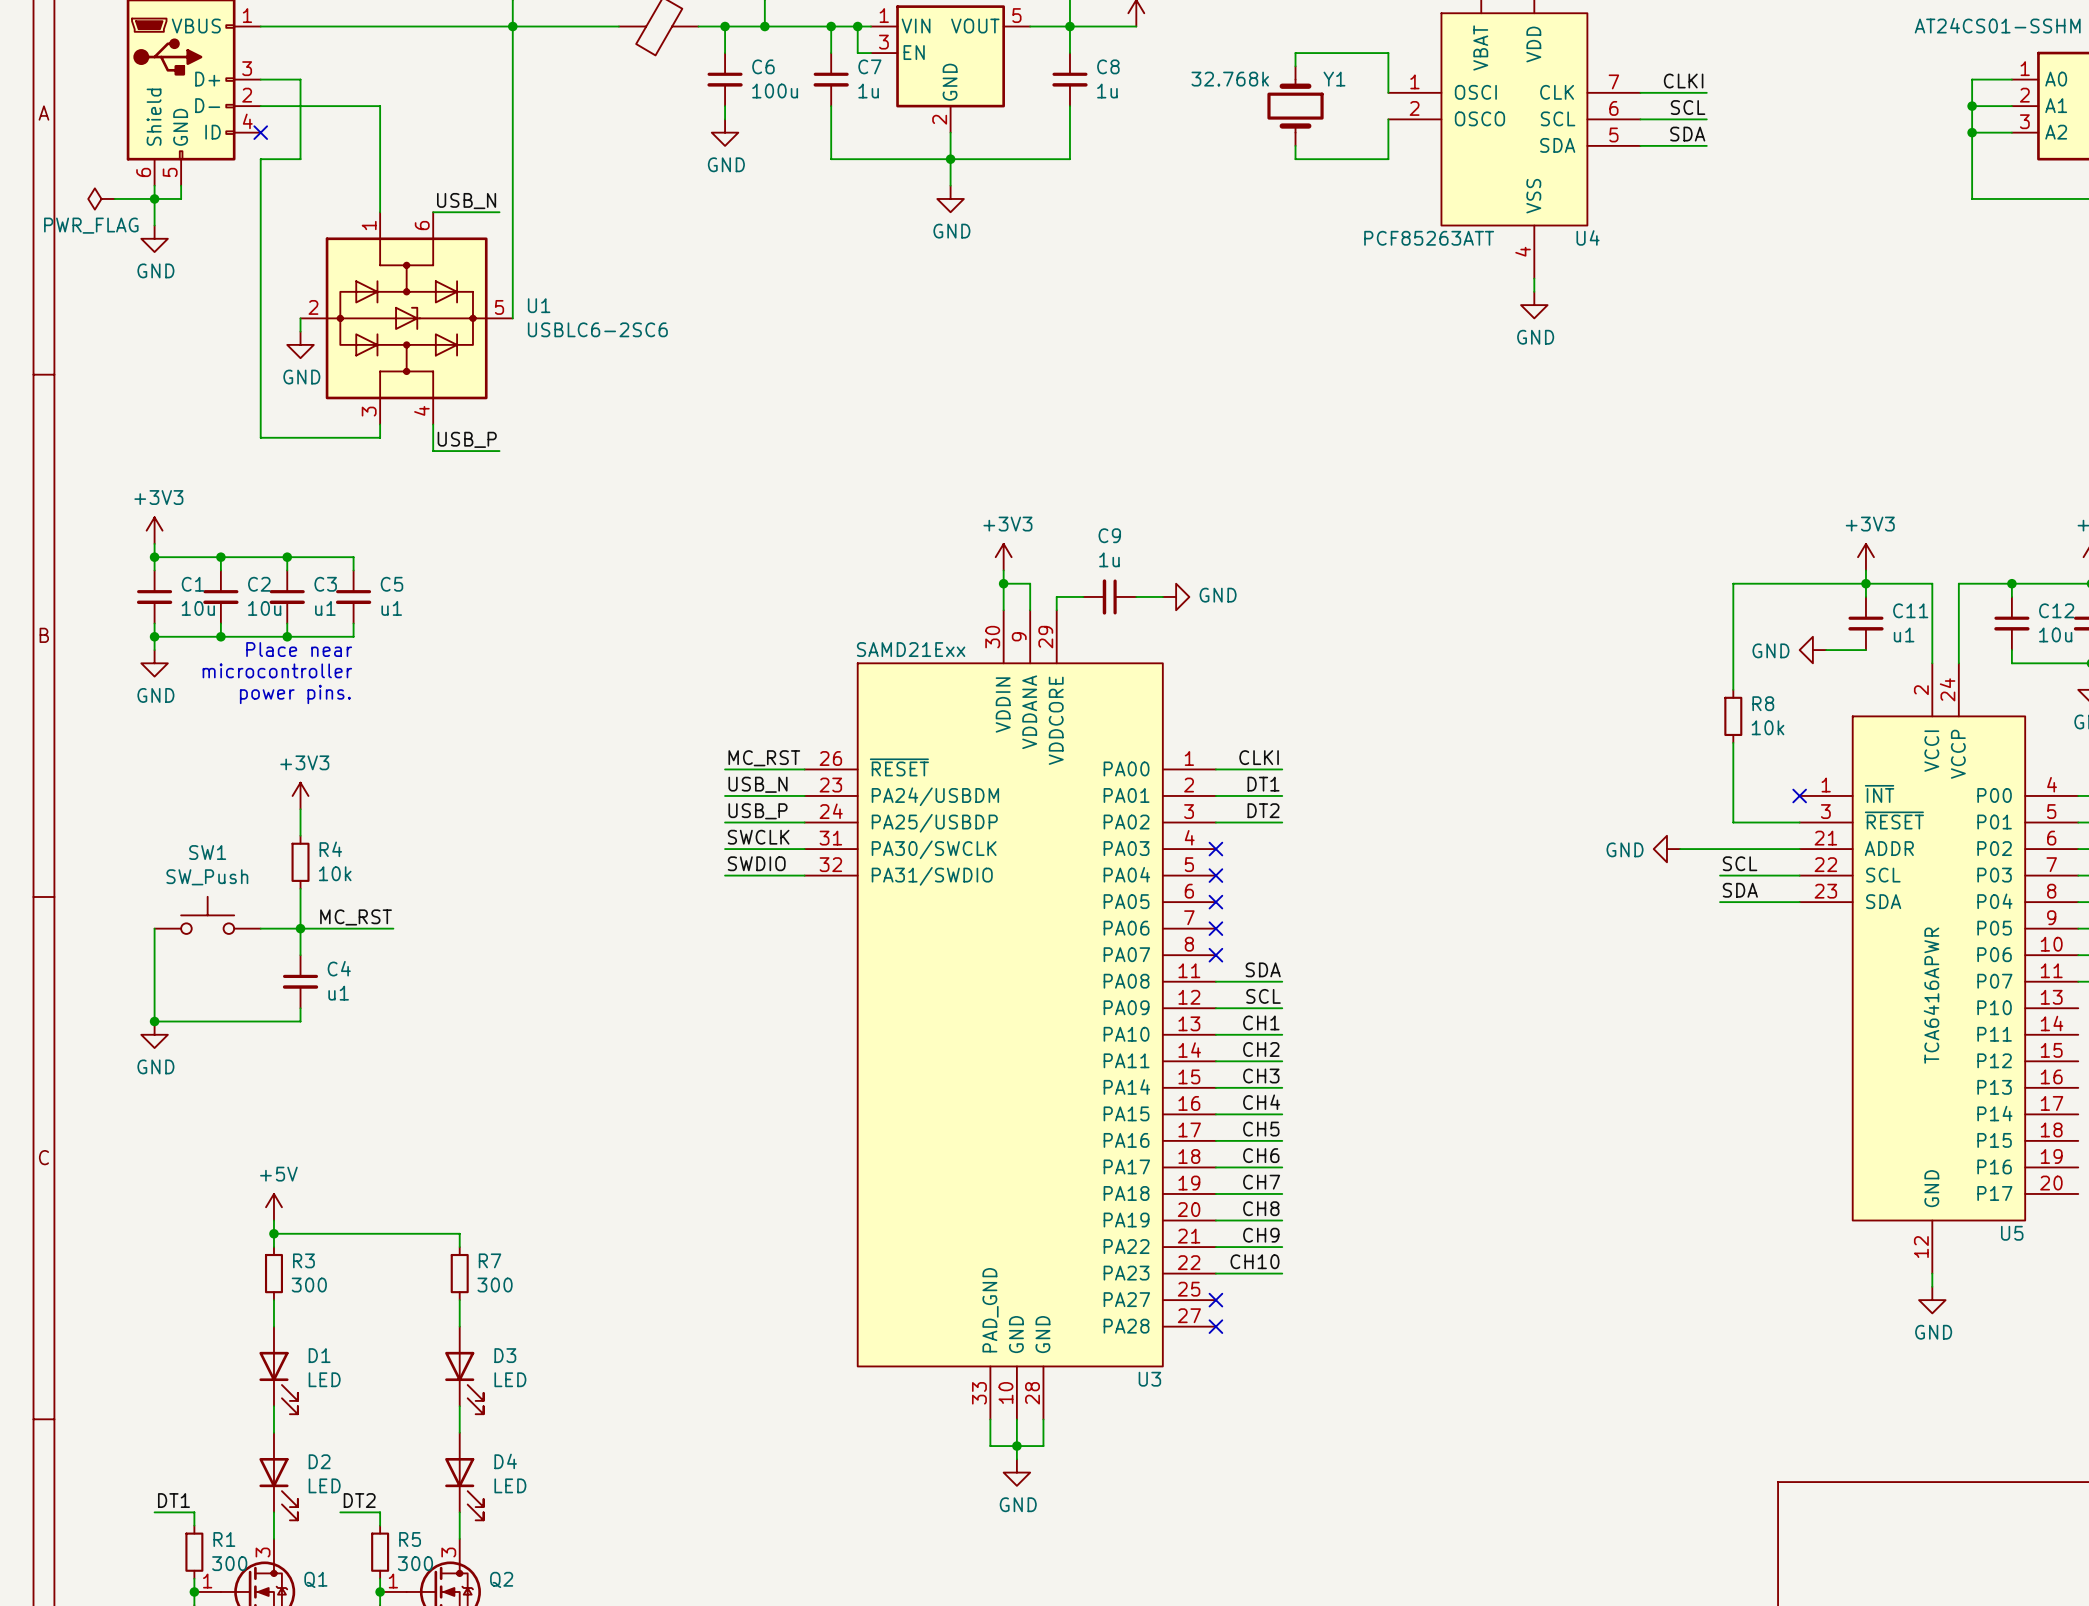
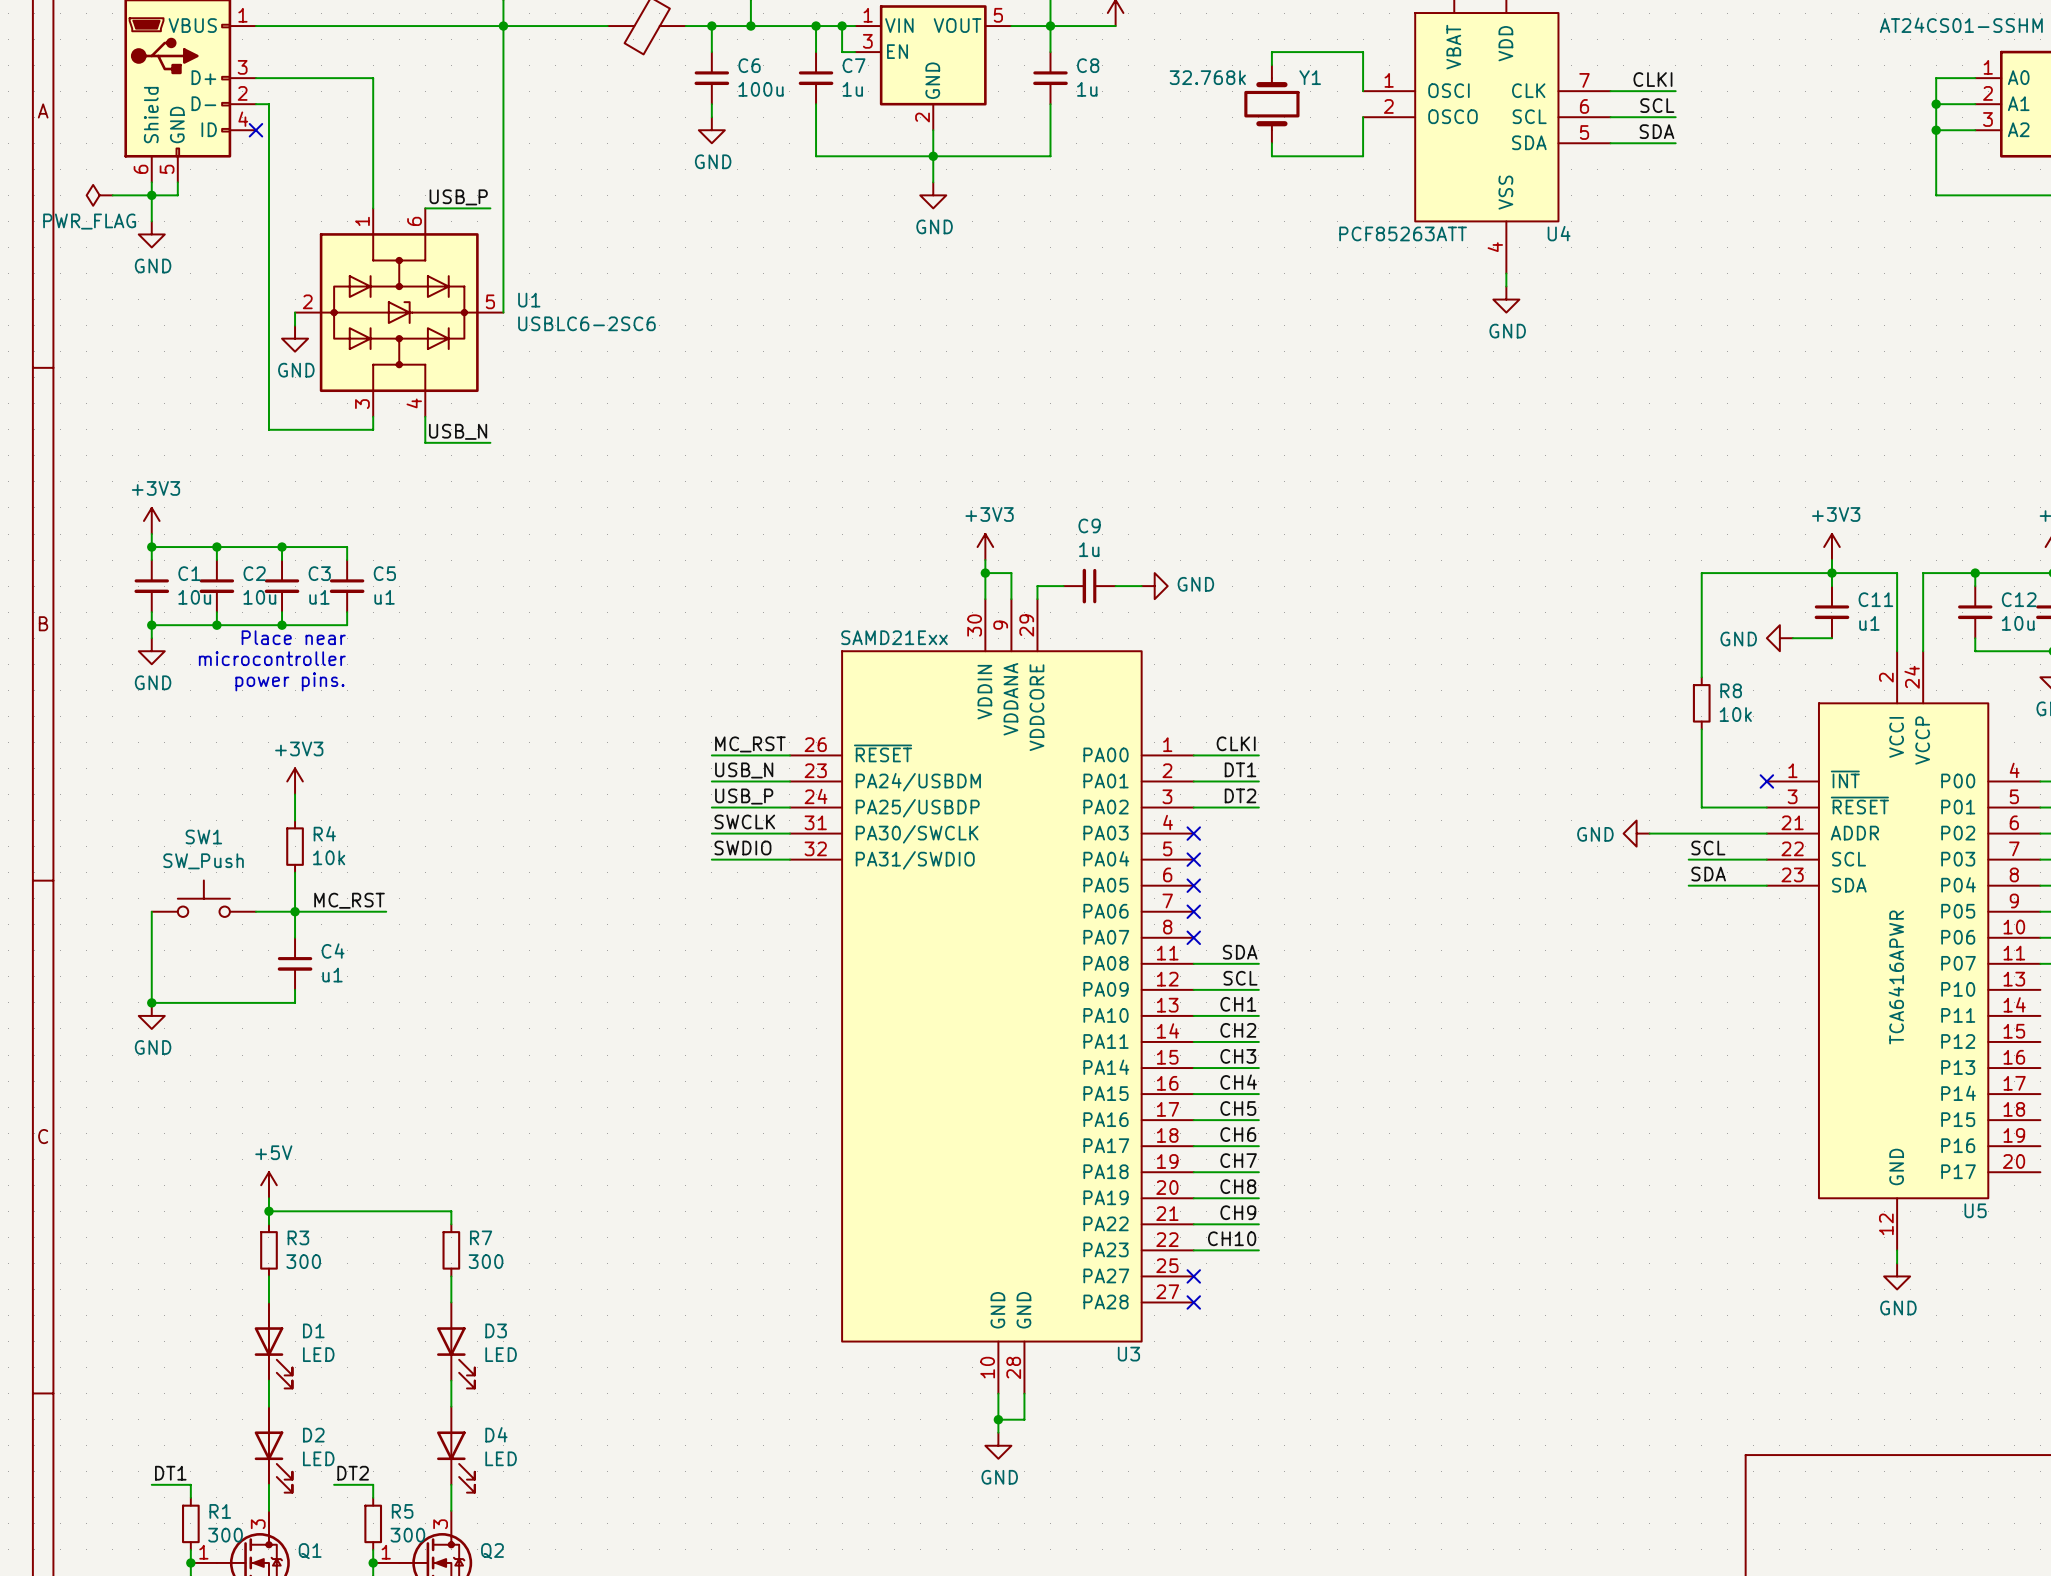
wire: (300, 79) (300, 159) (260, 159) (260, 437) (273, 437) -> (268, 104) (268, 429)
wire: (273, 106) (380, 106) -> (295, 78) (373, 78) (373, 104)
label: USB_N (466, 201) -> USB_P (458, 197)
label: USB_P (467, 439) -> USB_N (458, 431)
U3 symbol: [804, 610, 1216, 1420] -> [789, 599, 1194, 1394]
wire: (990, 1419) (990, 1446) (1016, 1446) -> none

